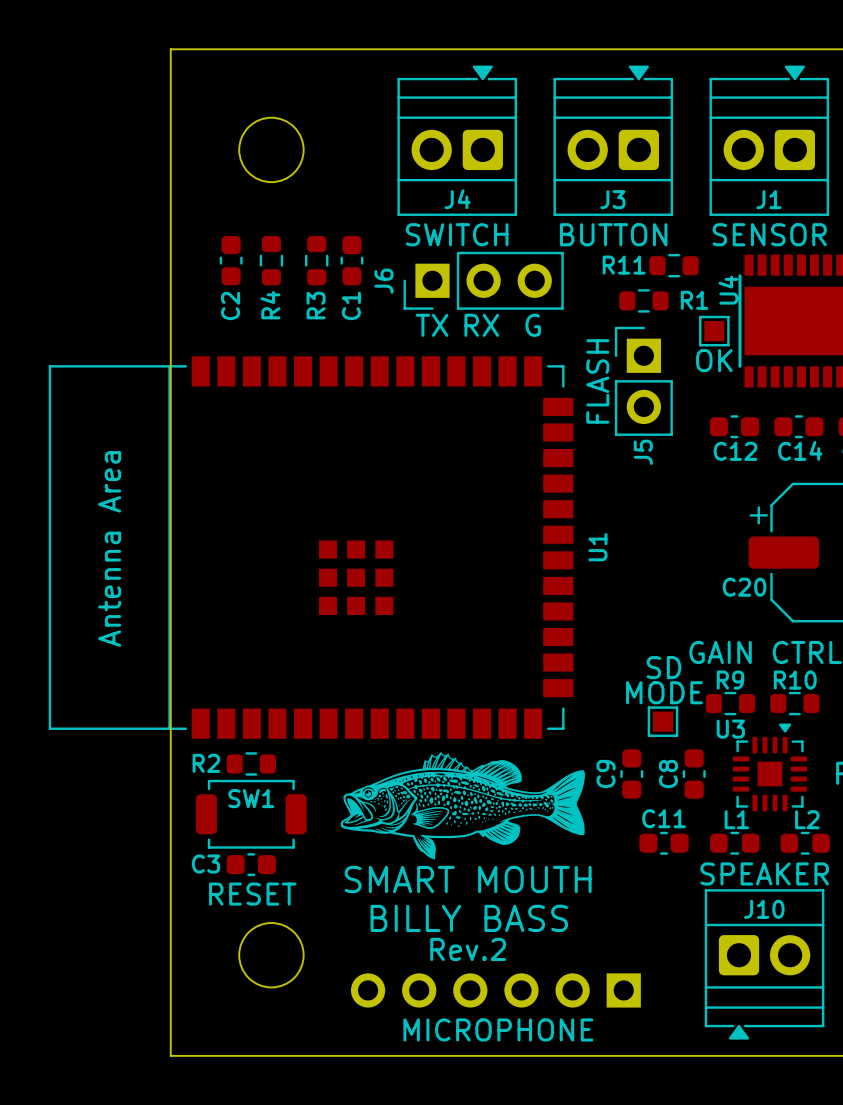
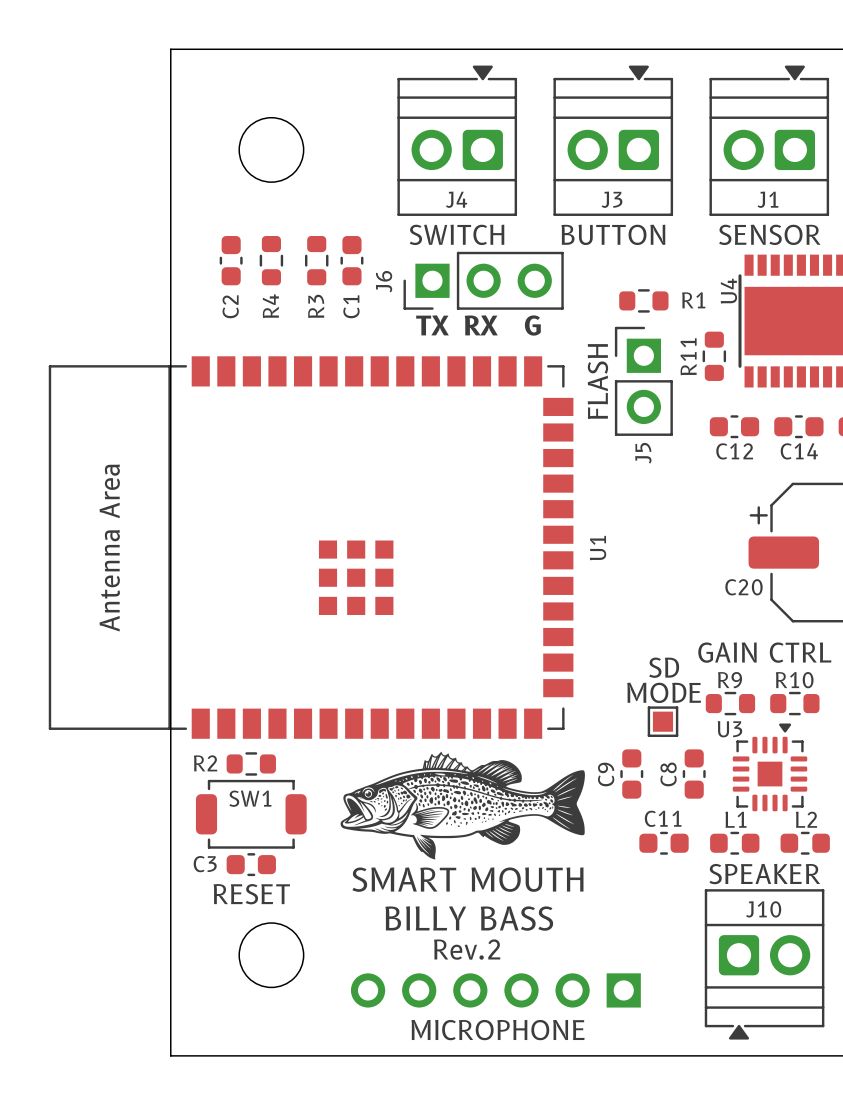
R11 rotation: 0° (674, 265) -> 90° clockwise (714, 356)
R11 position: (674, 265) -> (714, 356)
part: (714, 331) -> none
text: OK (714, 360) -> none

